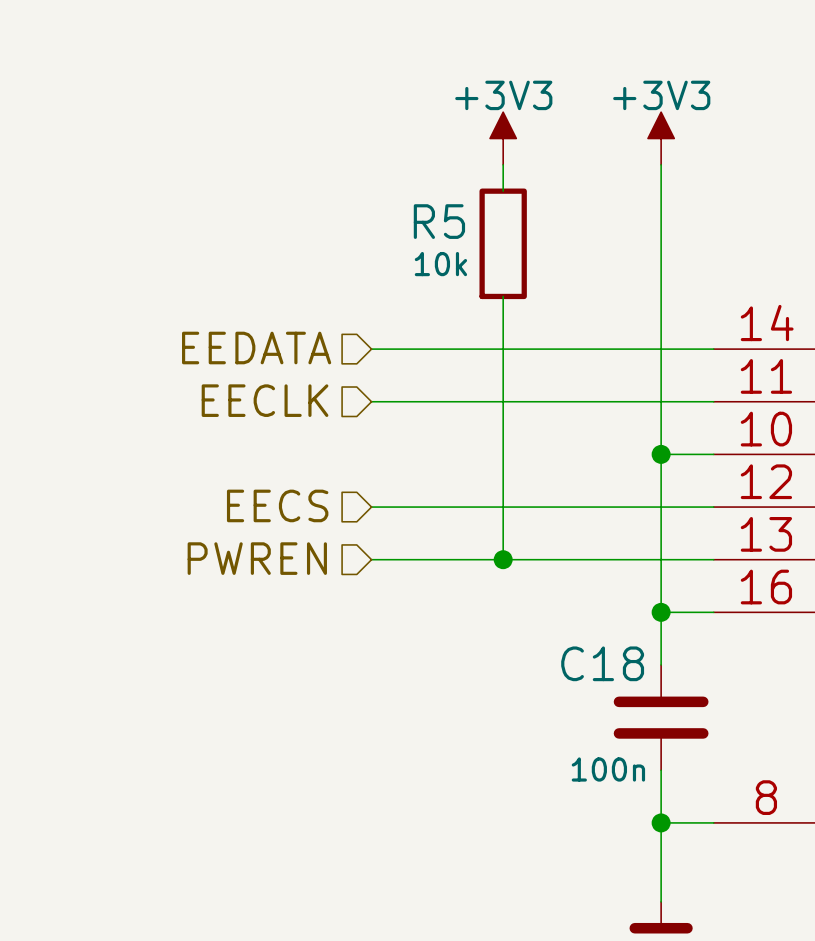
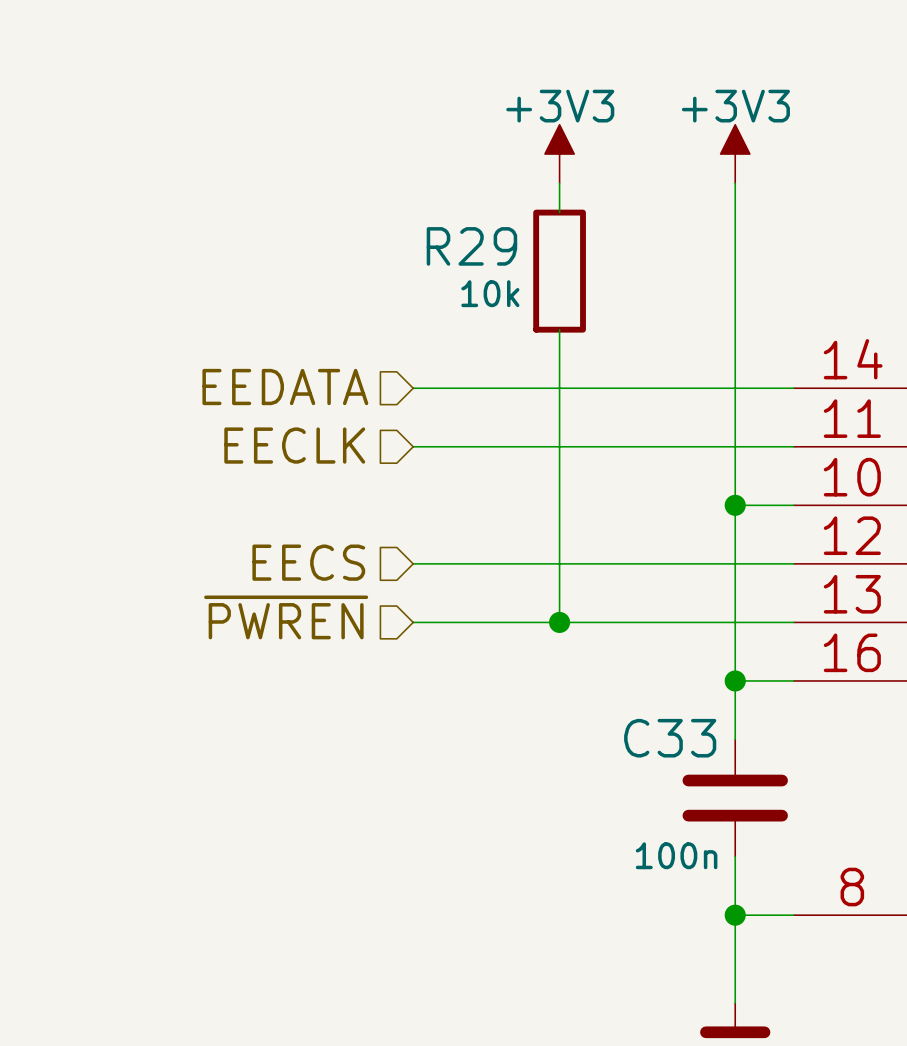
R5 name: R5 (439, 221) -> R29 (471, 246)
hierarchical label: PWREN (257, 558) -> ~{PWREN} (286, 617)
C18 name: C18 (602, 663) -> C33 (670, 738)

